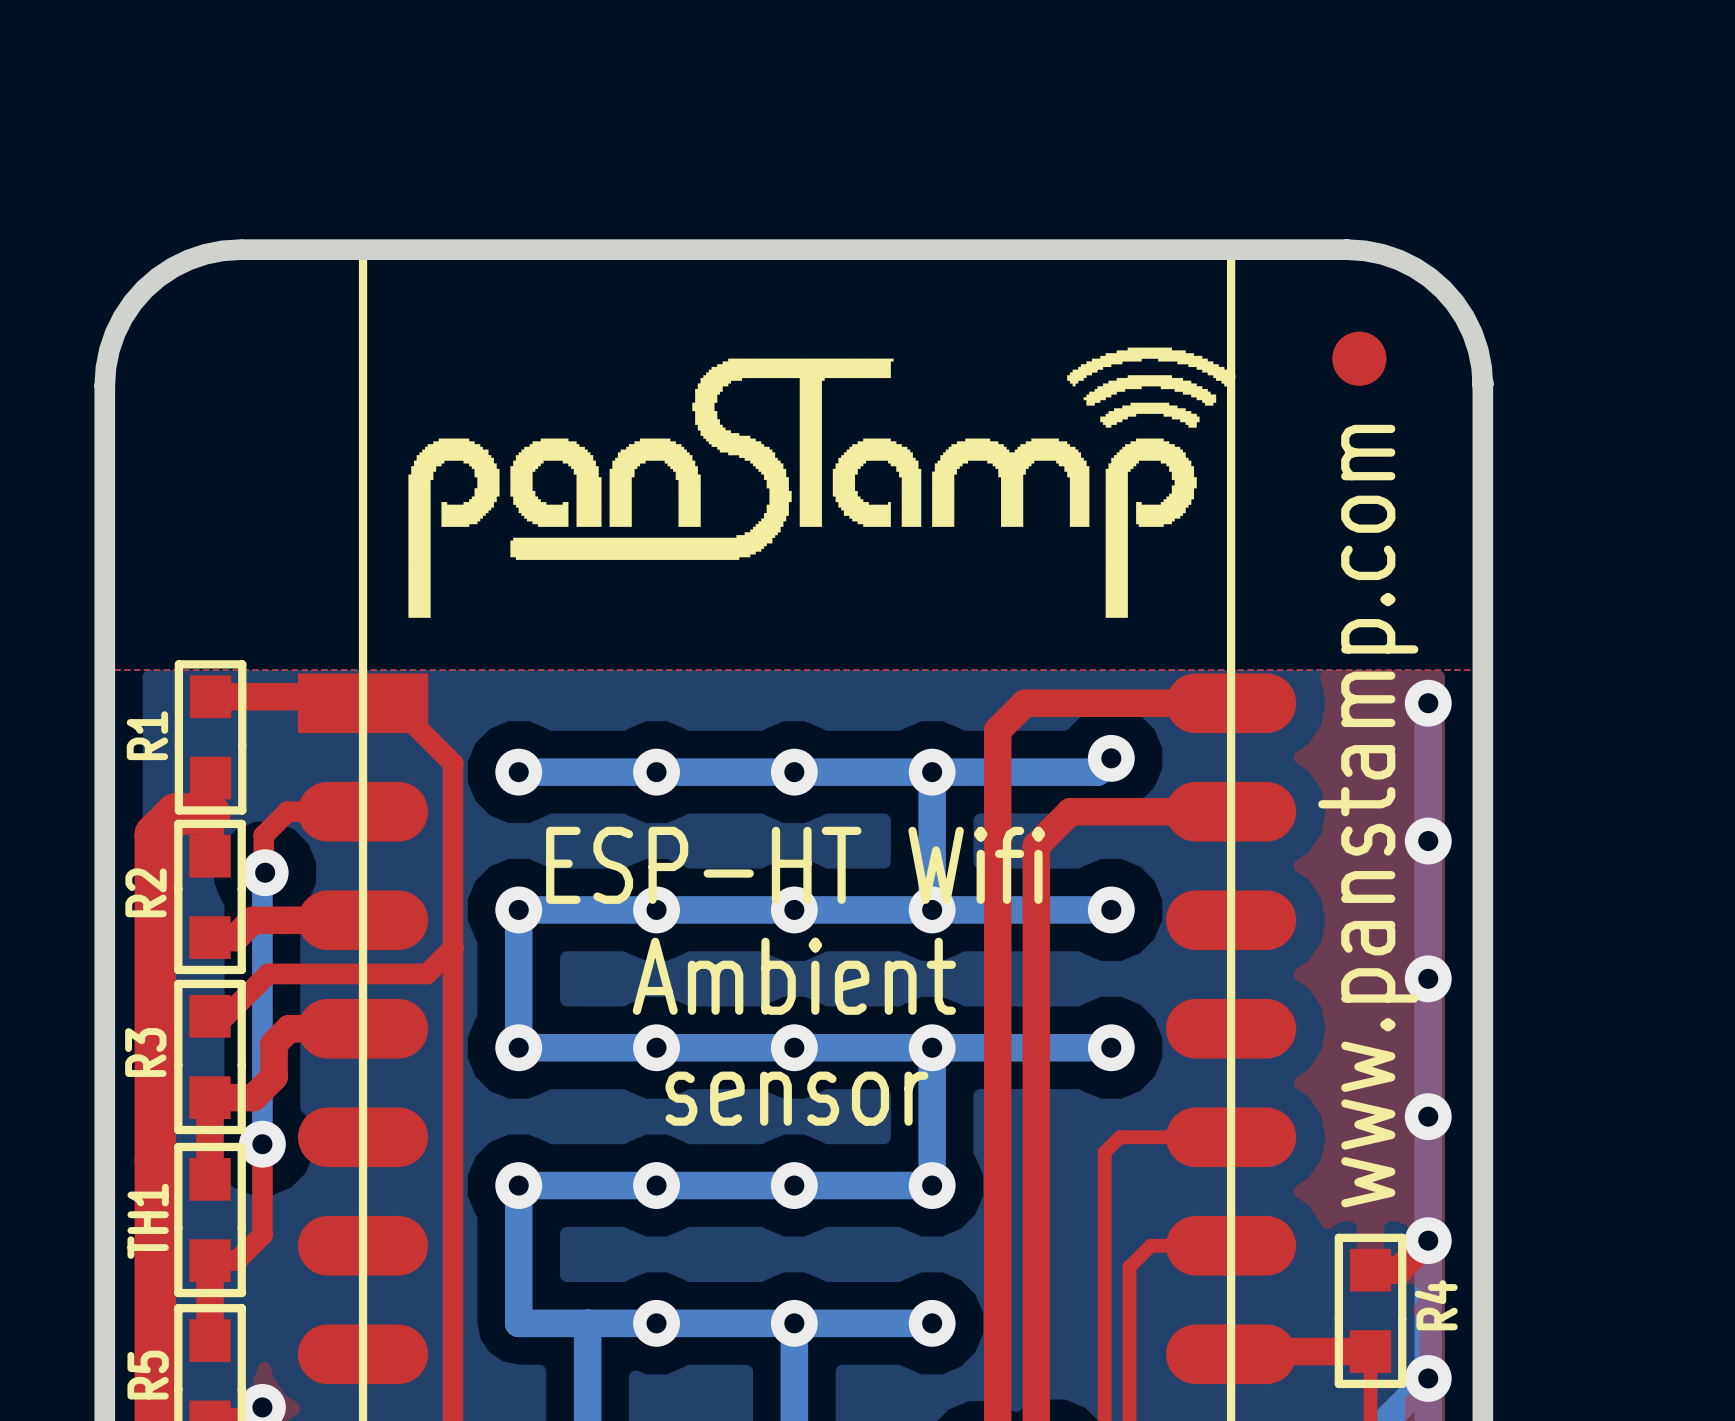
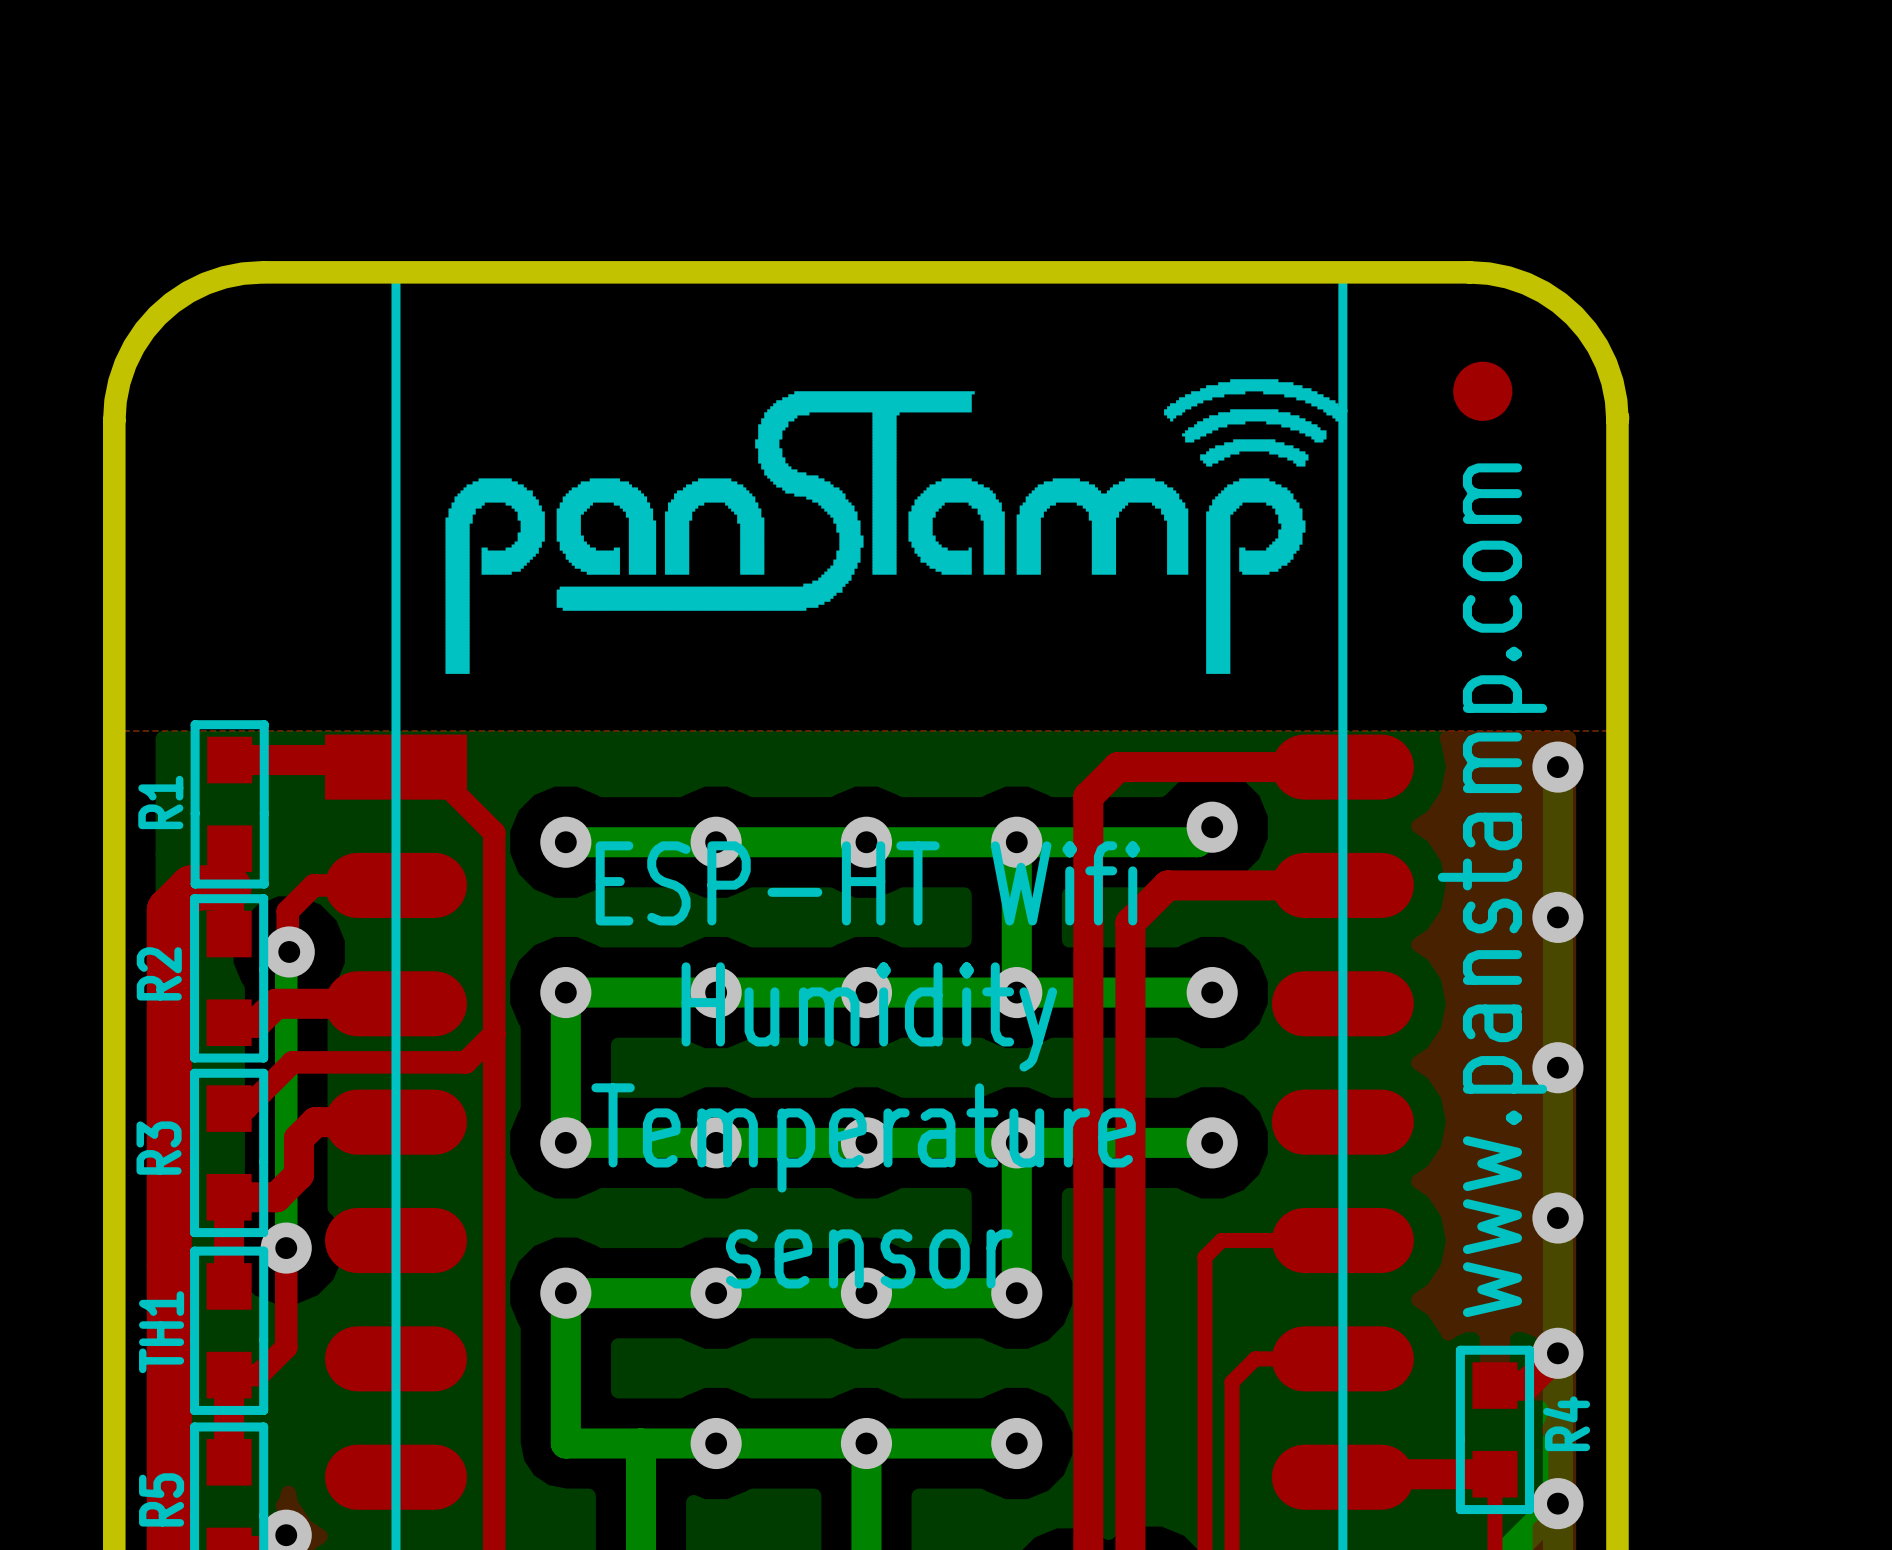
text position: ESP-HT Wifi (795, 865) -> ESP-HT Wifi (867, 883)
text: none -> Humidity (869, 1016)
text: Ambient (794, 976) -> none
text: none -> Temperature (863, 1137)
text position: sensor (796, 1098) -> sensor (869, 1258)

